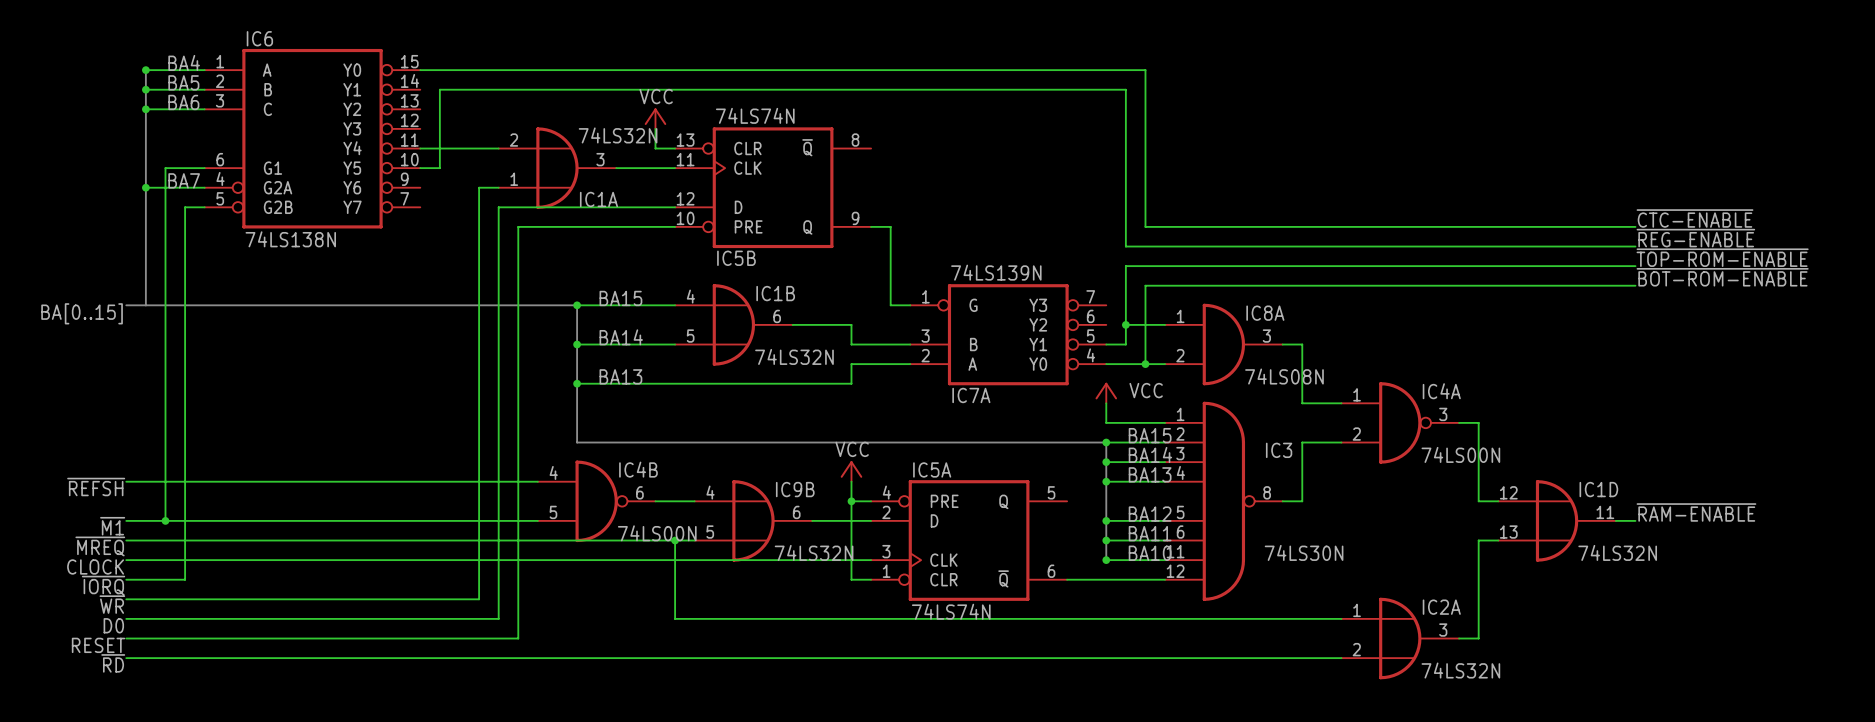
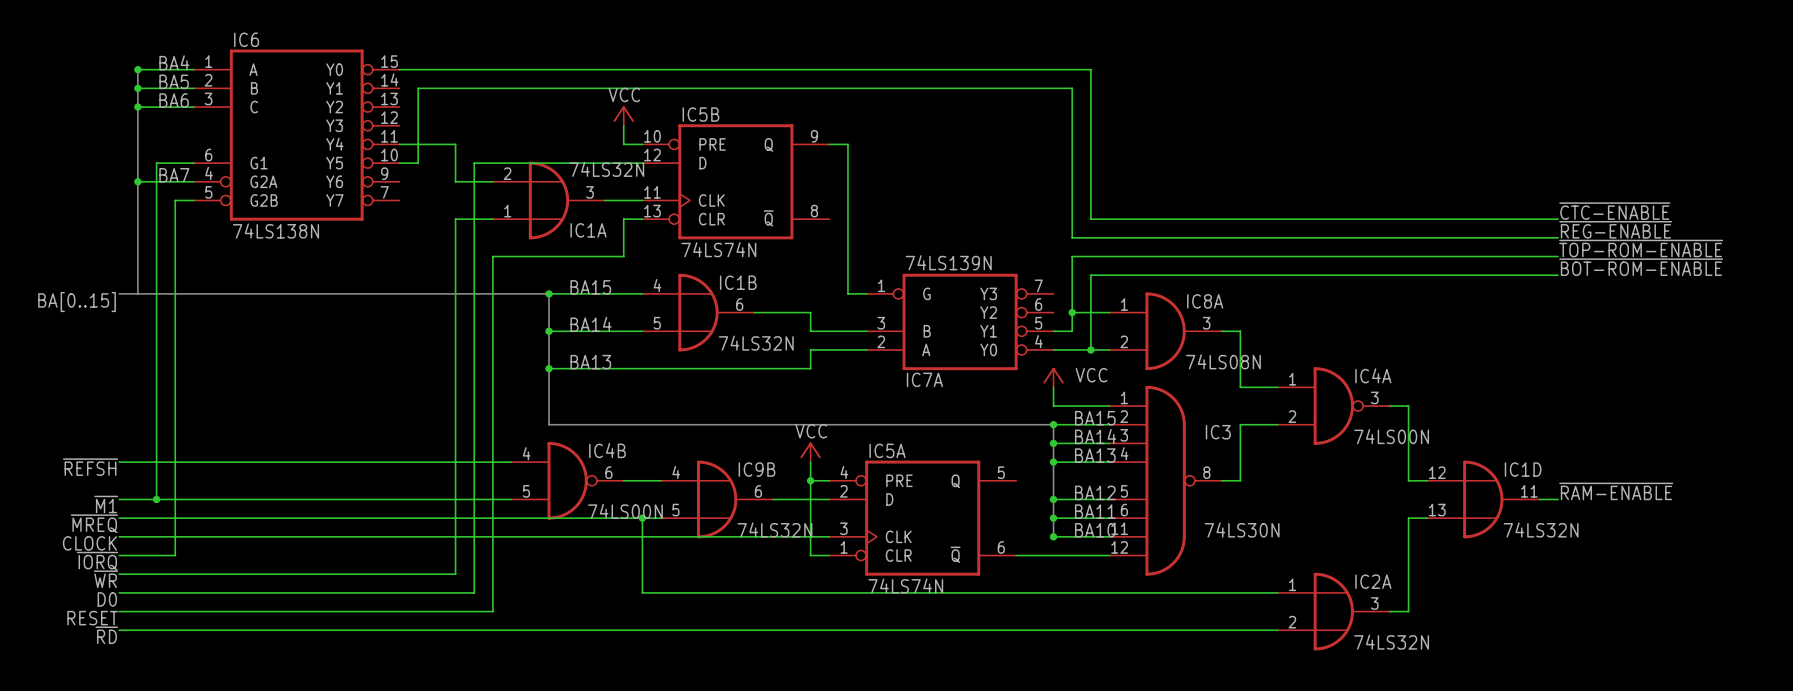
wire: (479, 148) (498, 148) -> (455, 144) (455, 181)
IC1A position: (557, 168) -> (548, 200)
wire: (479, 187) (479, 226) -> (492, 219) (455, 219)
IC5B flip: as is (773, 187) -> up-down (735, 181)
wire: (498, 207) (635, 207) -> (474, 200) (474, 163) (586, 163)
wire: (655, 226) (518, 226) (518, 266) -> (623, 219) (623, 256) (492, 256)
wire: (871, 226) (890, 226) -> (829, 144) (847, 144) (847, 219)

